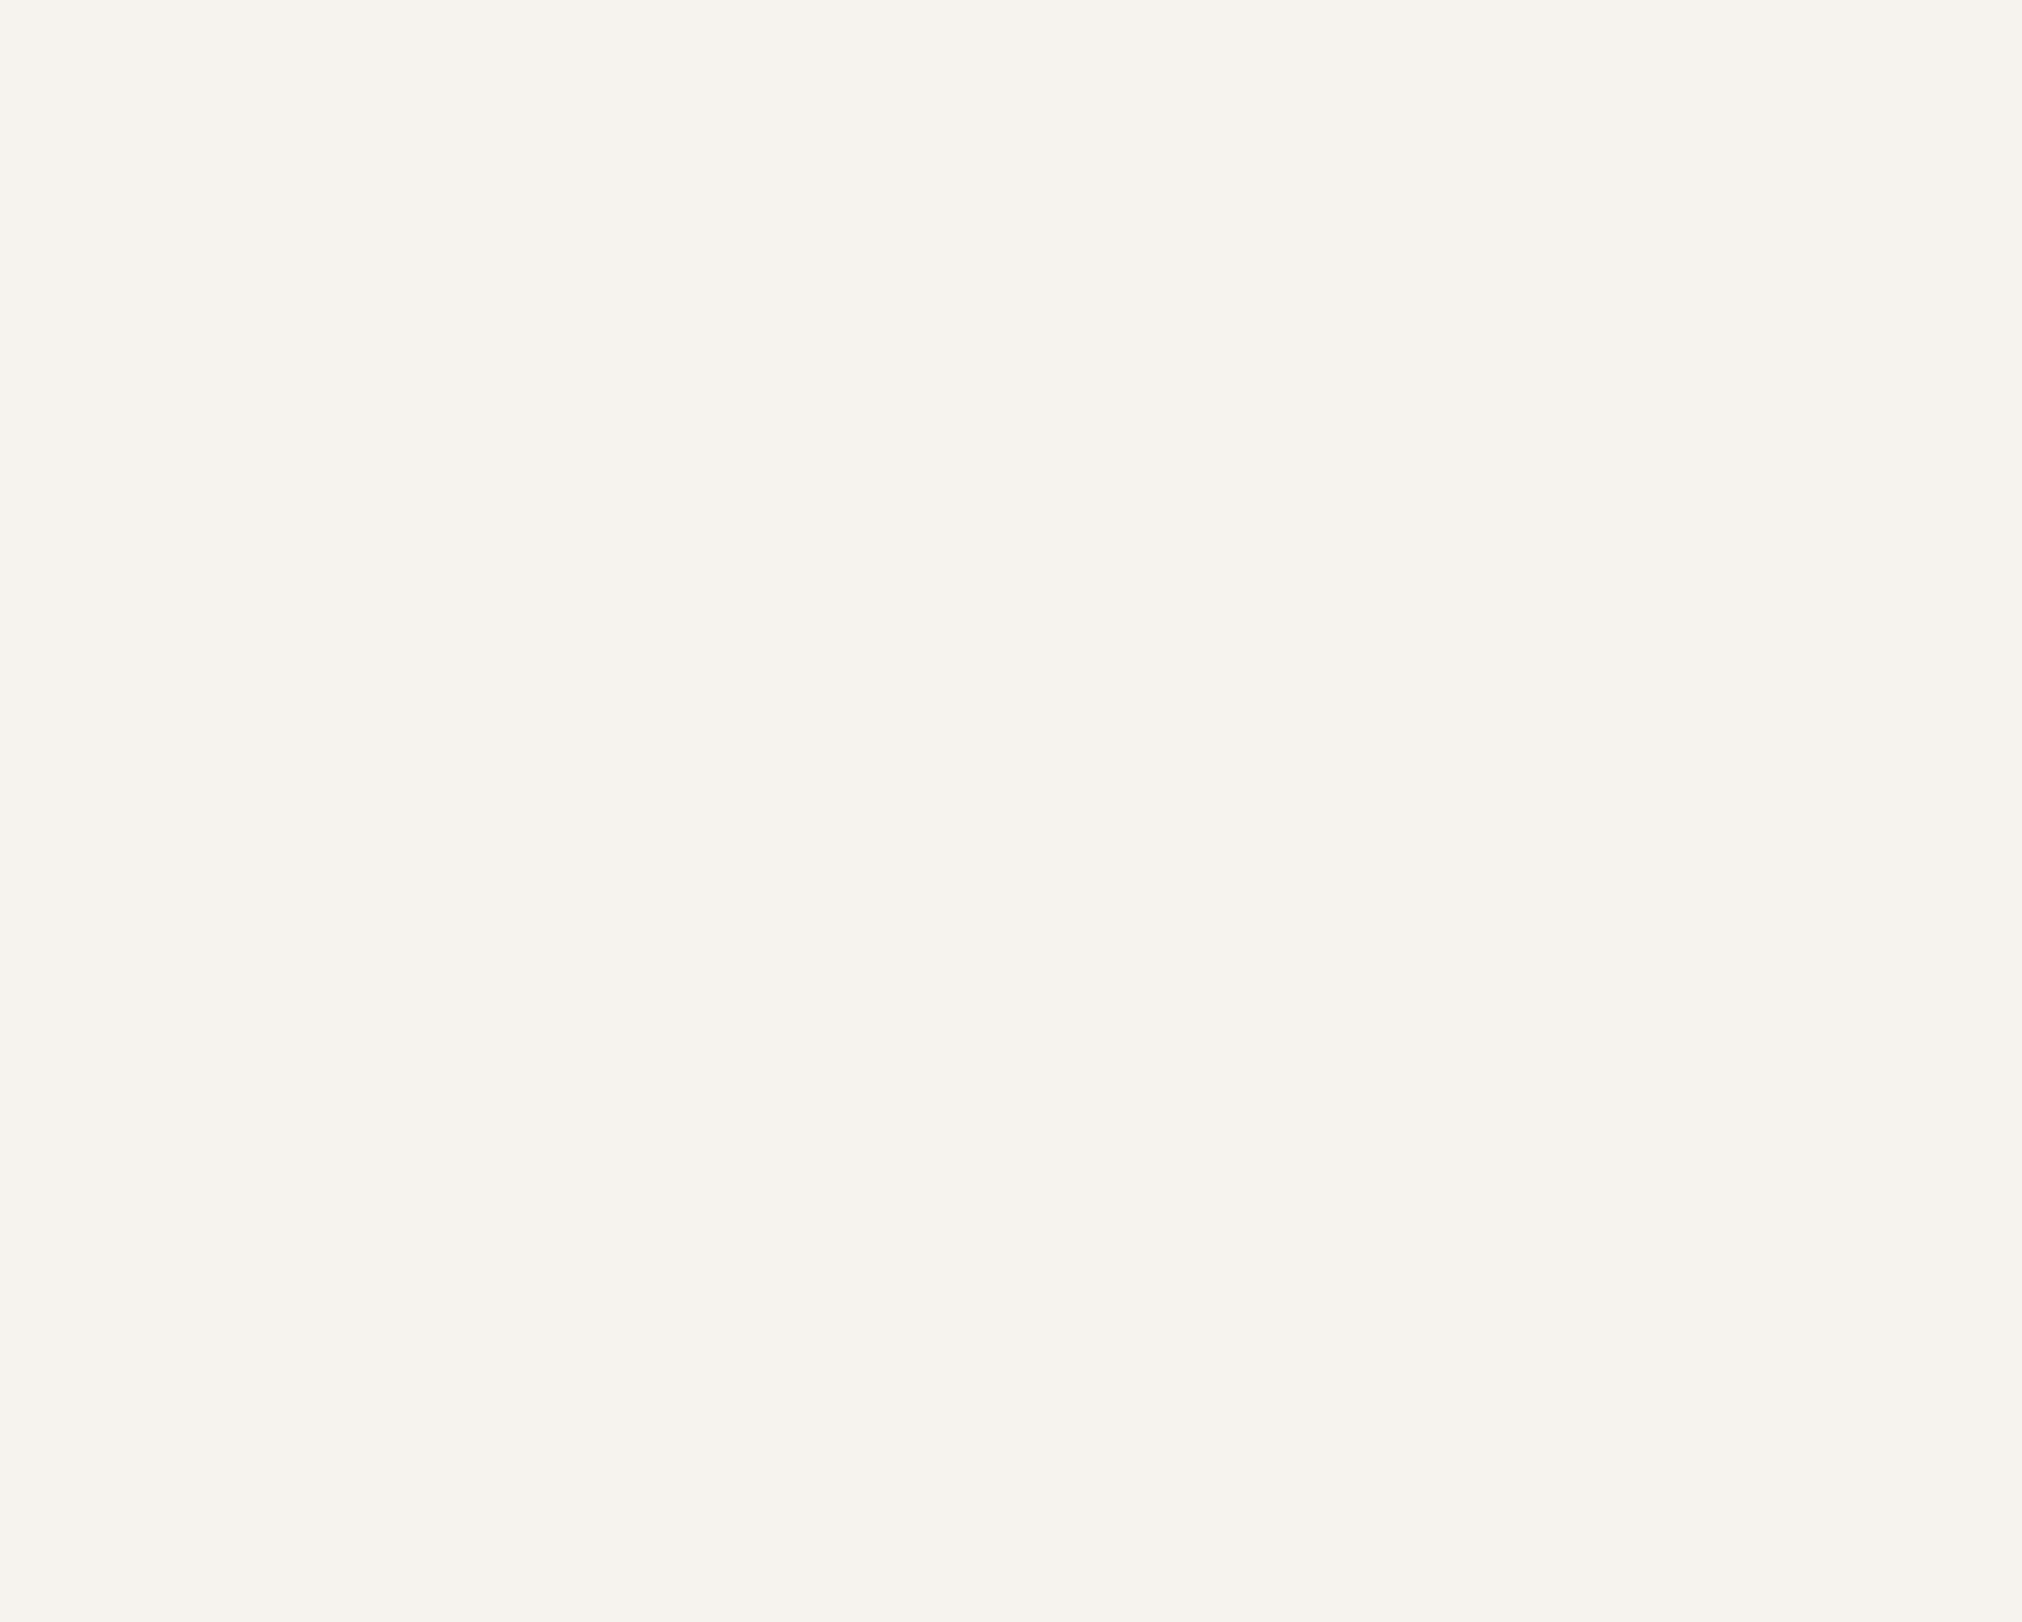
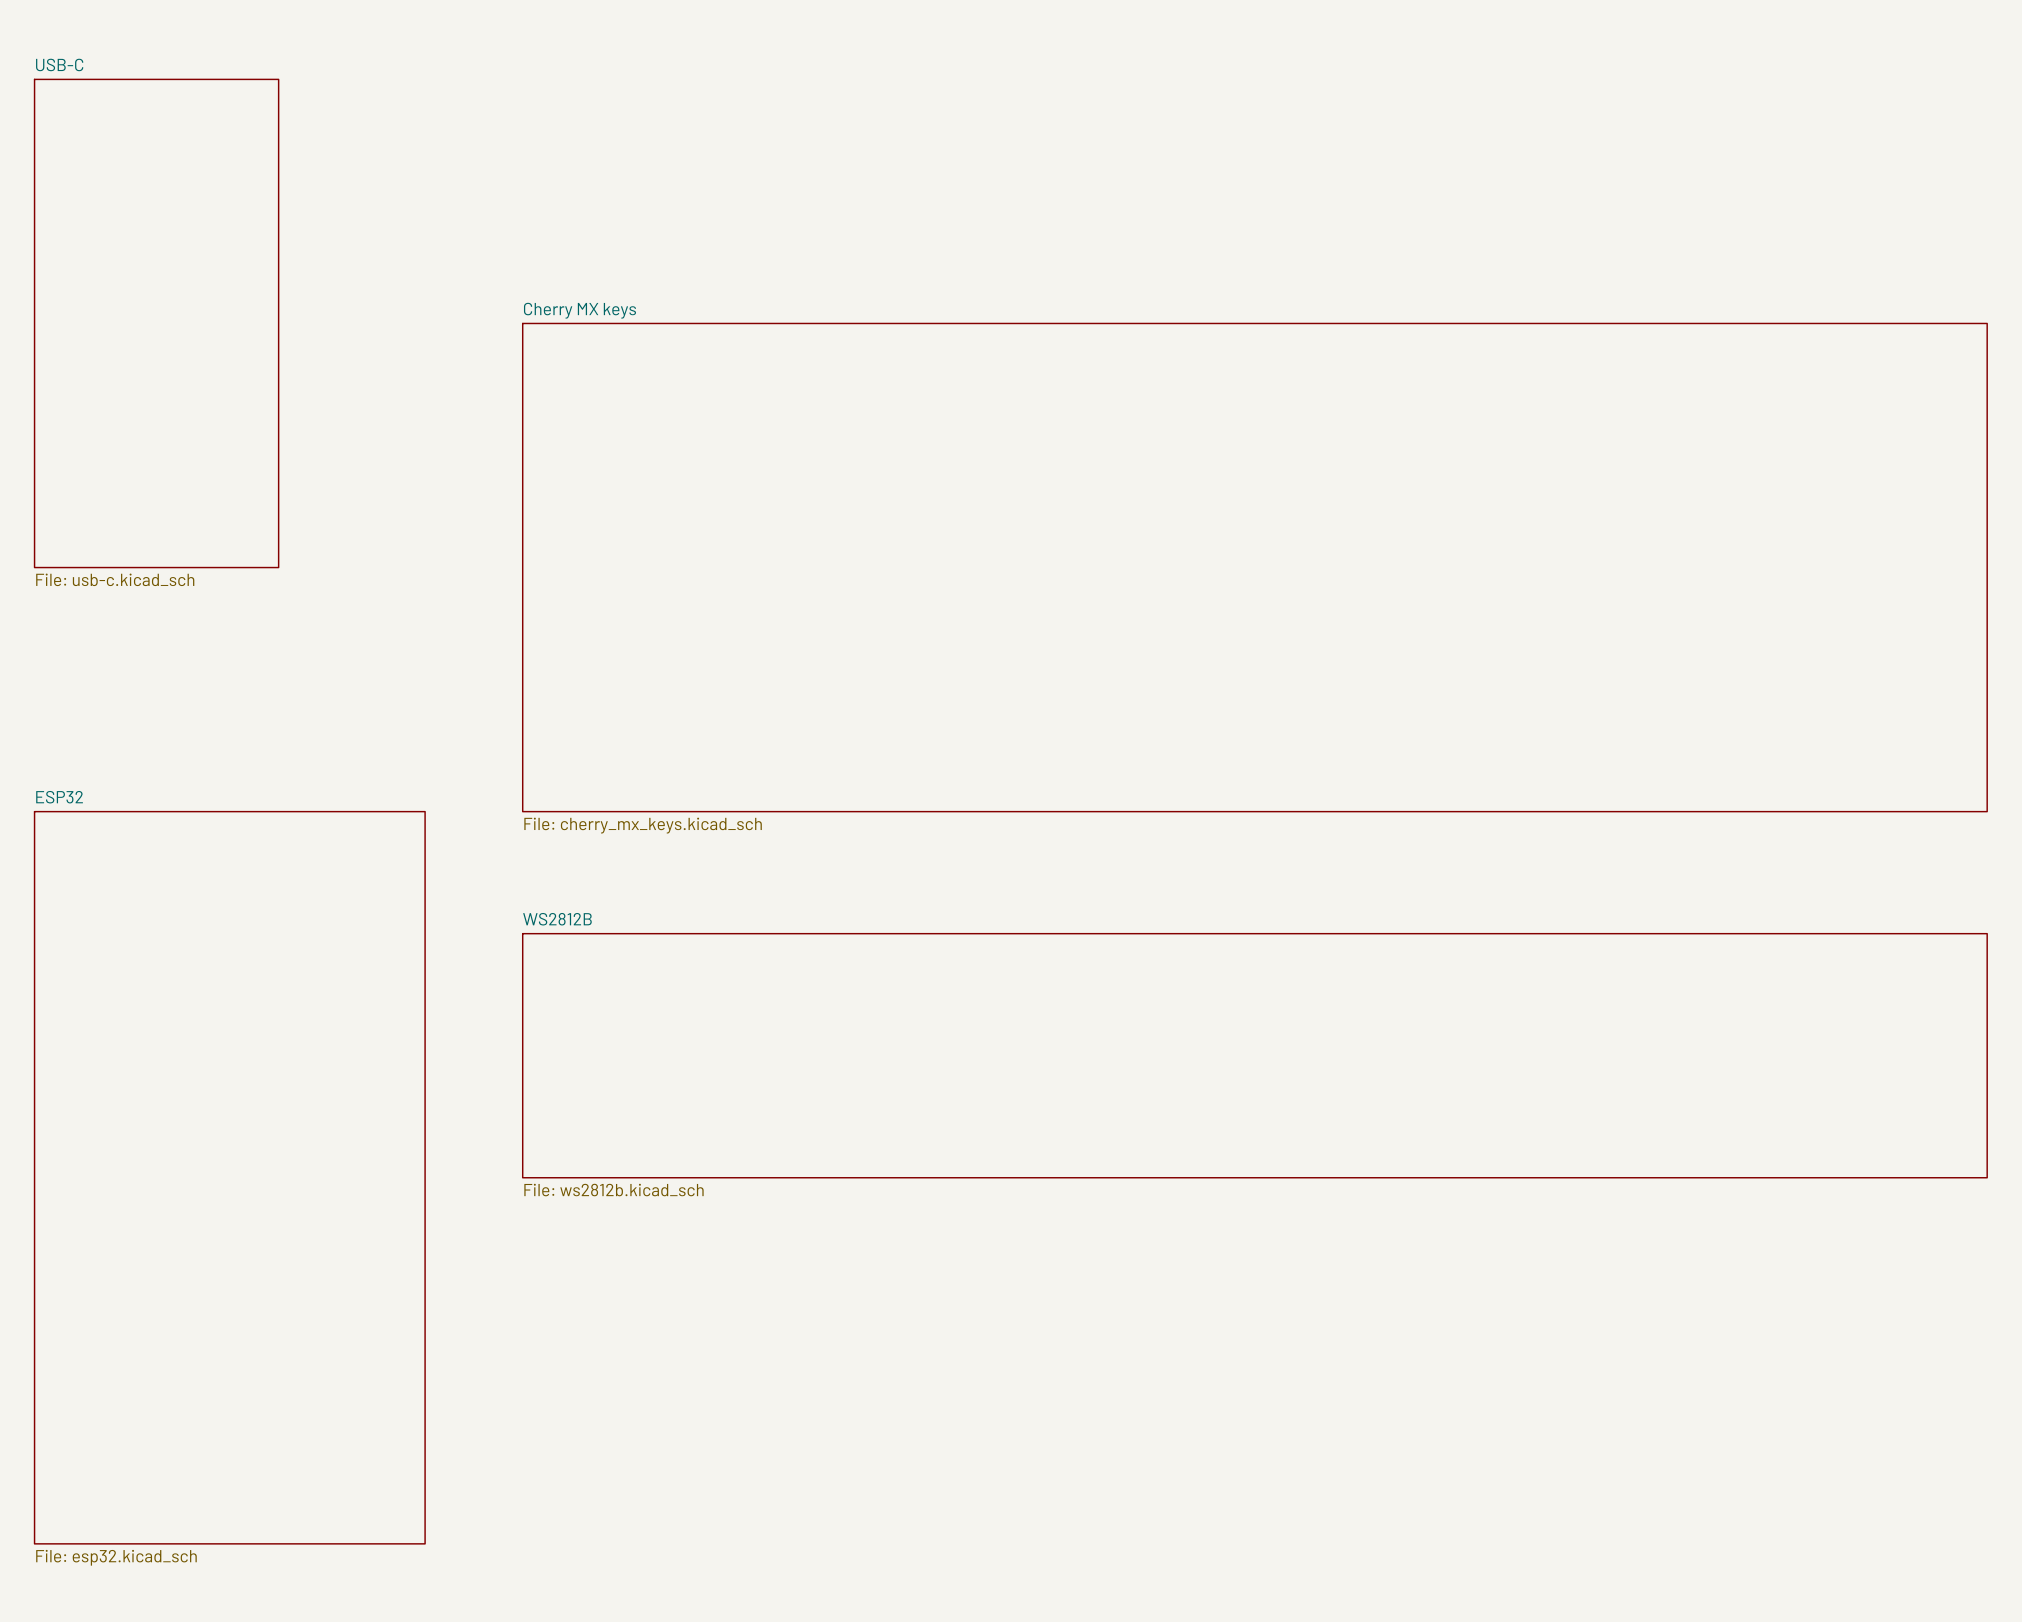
sheet USB-C: none -> File: usb-c.kicad_sch (156, 323)
sheet Cherry MX keys: none -> File: cherry_mx_keys.kicad_sch (1254, 567)
sheet WS2812B: none -> File: ws2812b.kicad_sch (1254, 1055)
sheet ESP32: none -> File: esp32.kicad_sch (229, 1177)

